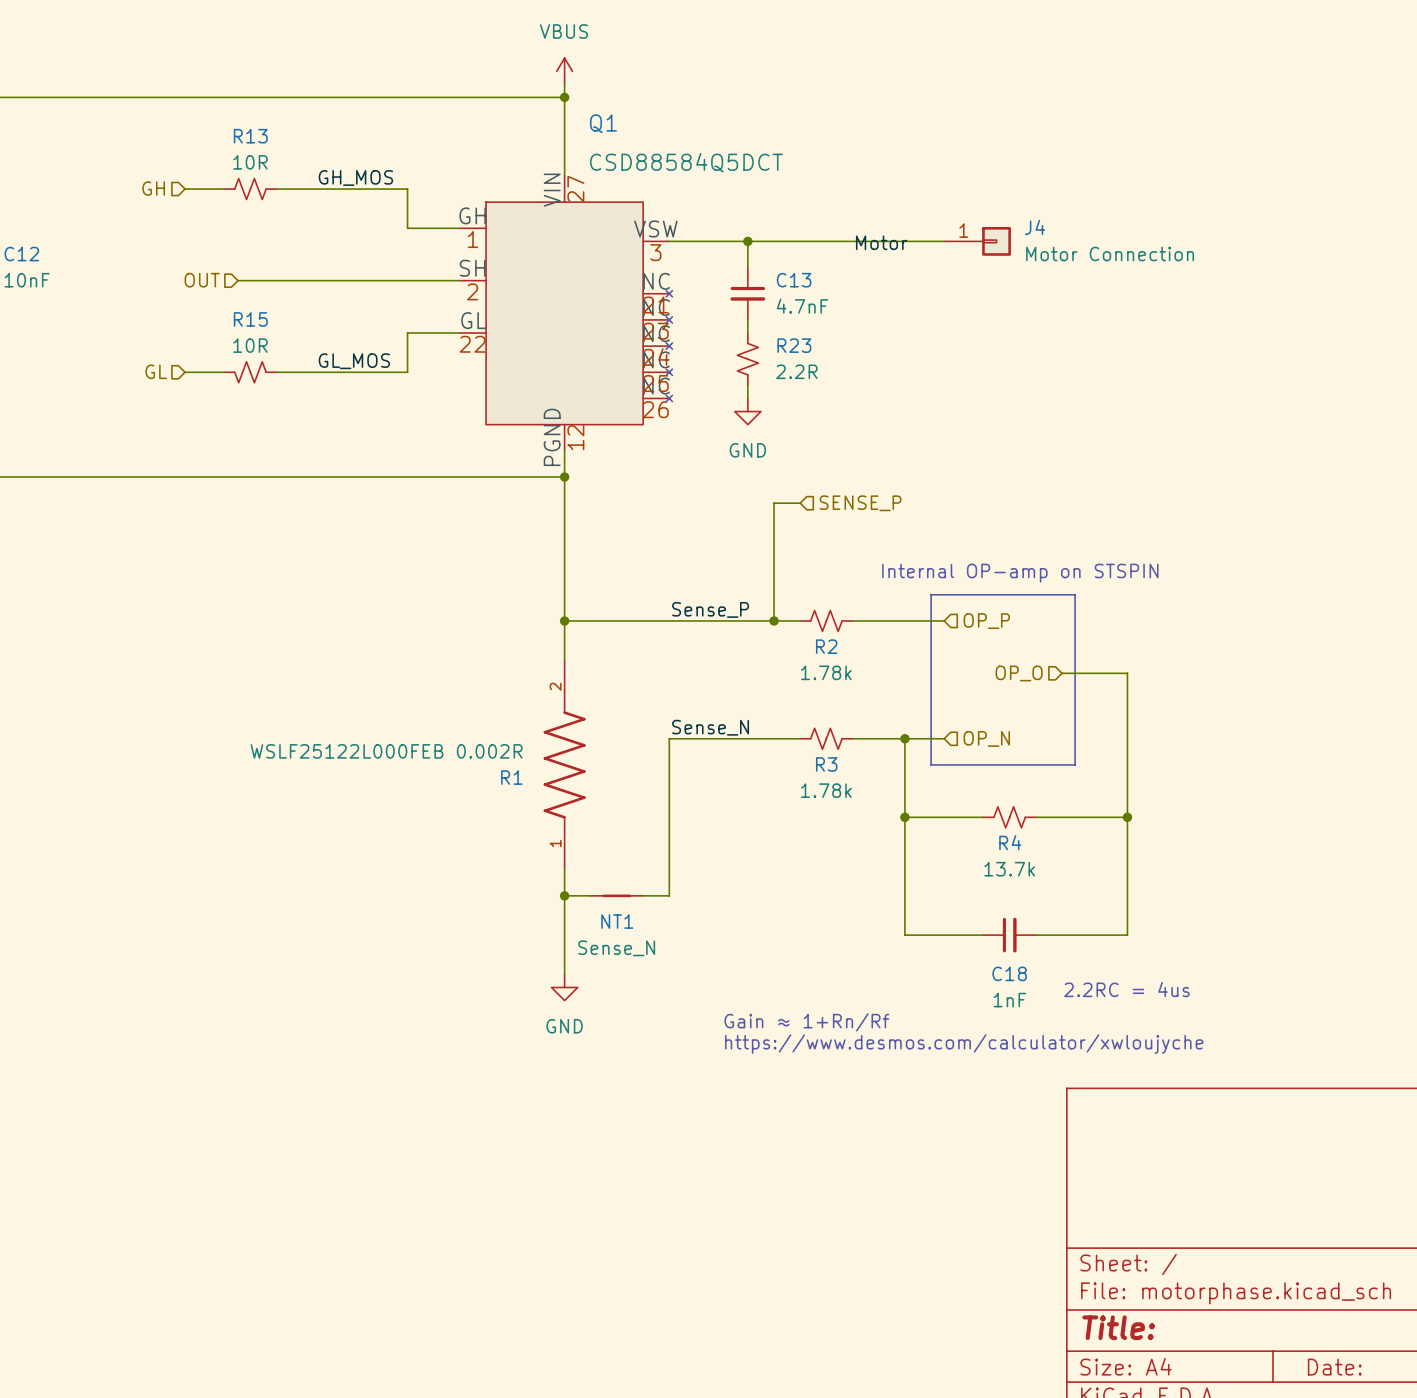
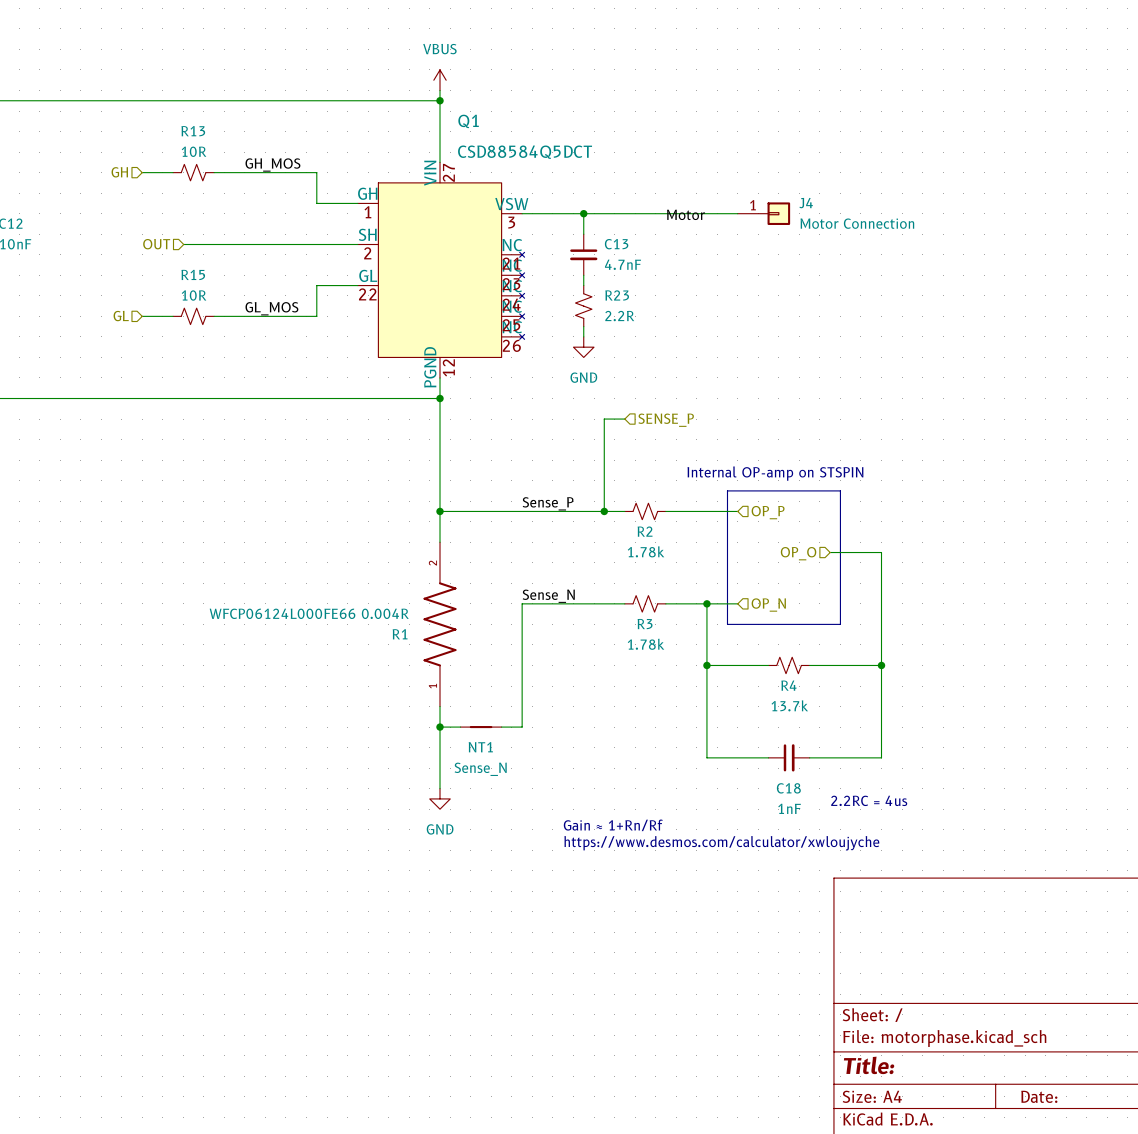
R15 flip: as is (250, 372) -> left-right (193, 316)
R1 value: WSLF25122L000FEB 0.002R (386, 751) -> WFCP06124L000FE66 0.004R (309, 613)

